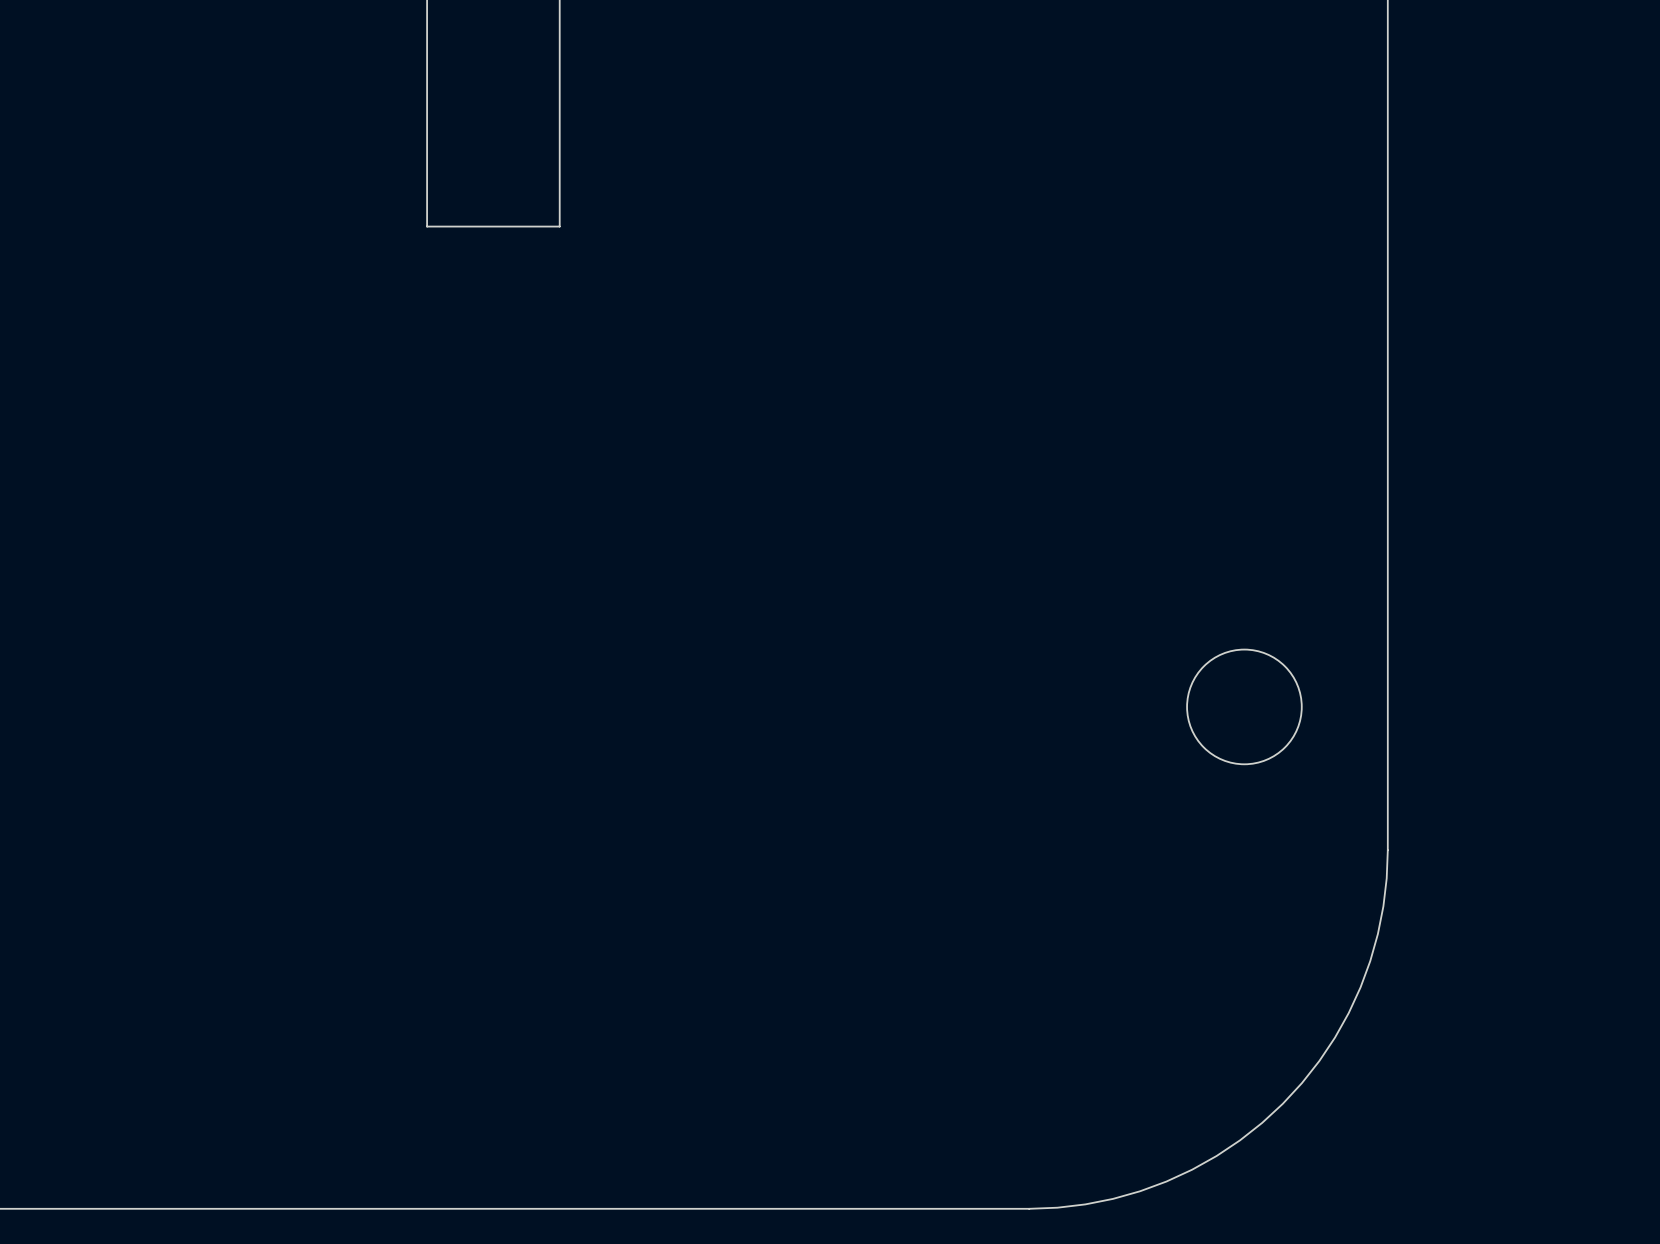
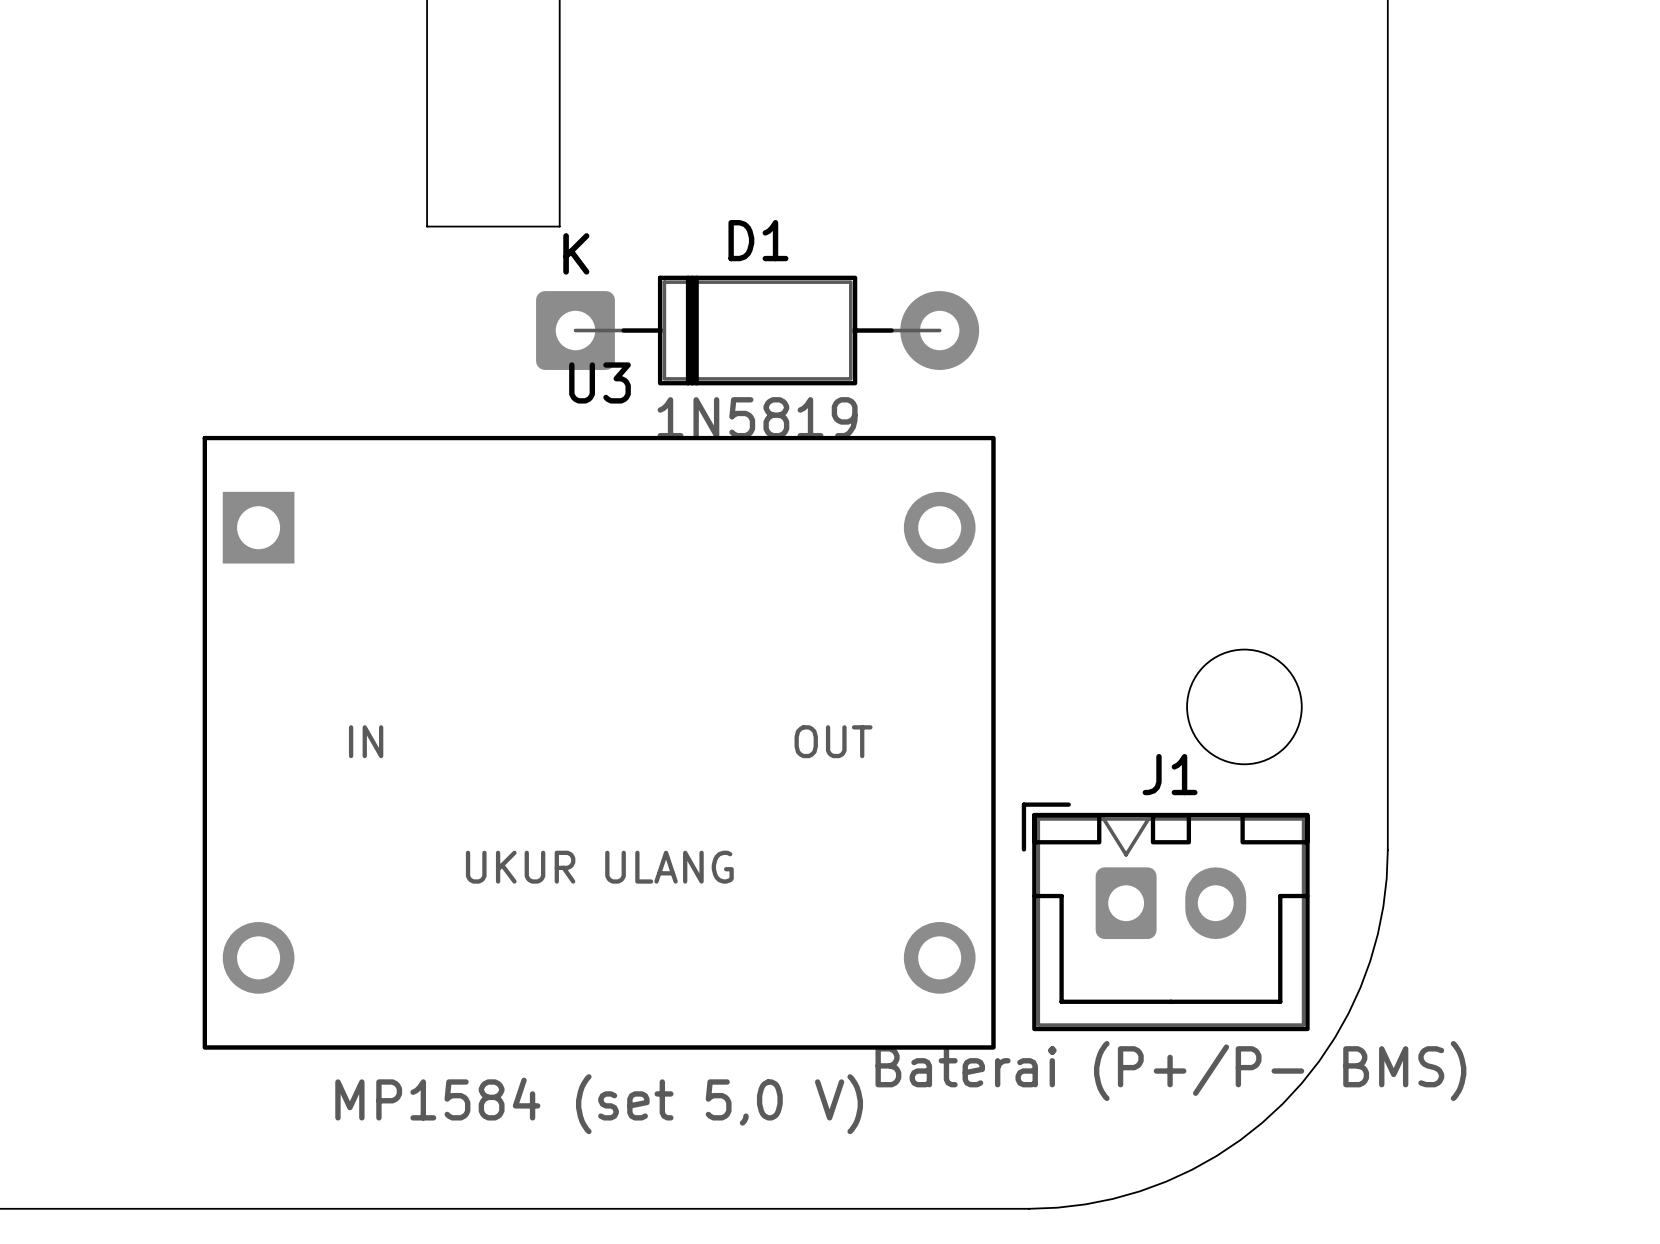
D1: none -> 1N5819 (757, 330)
U3: none -> MP1584 (set 5,0 V) (599, 742)
J1: none -> Baterai (P+/P- BMS) (1165, 916)

